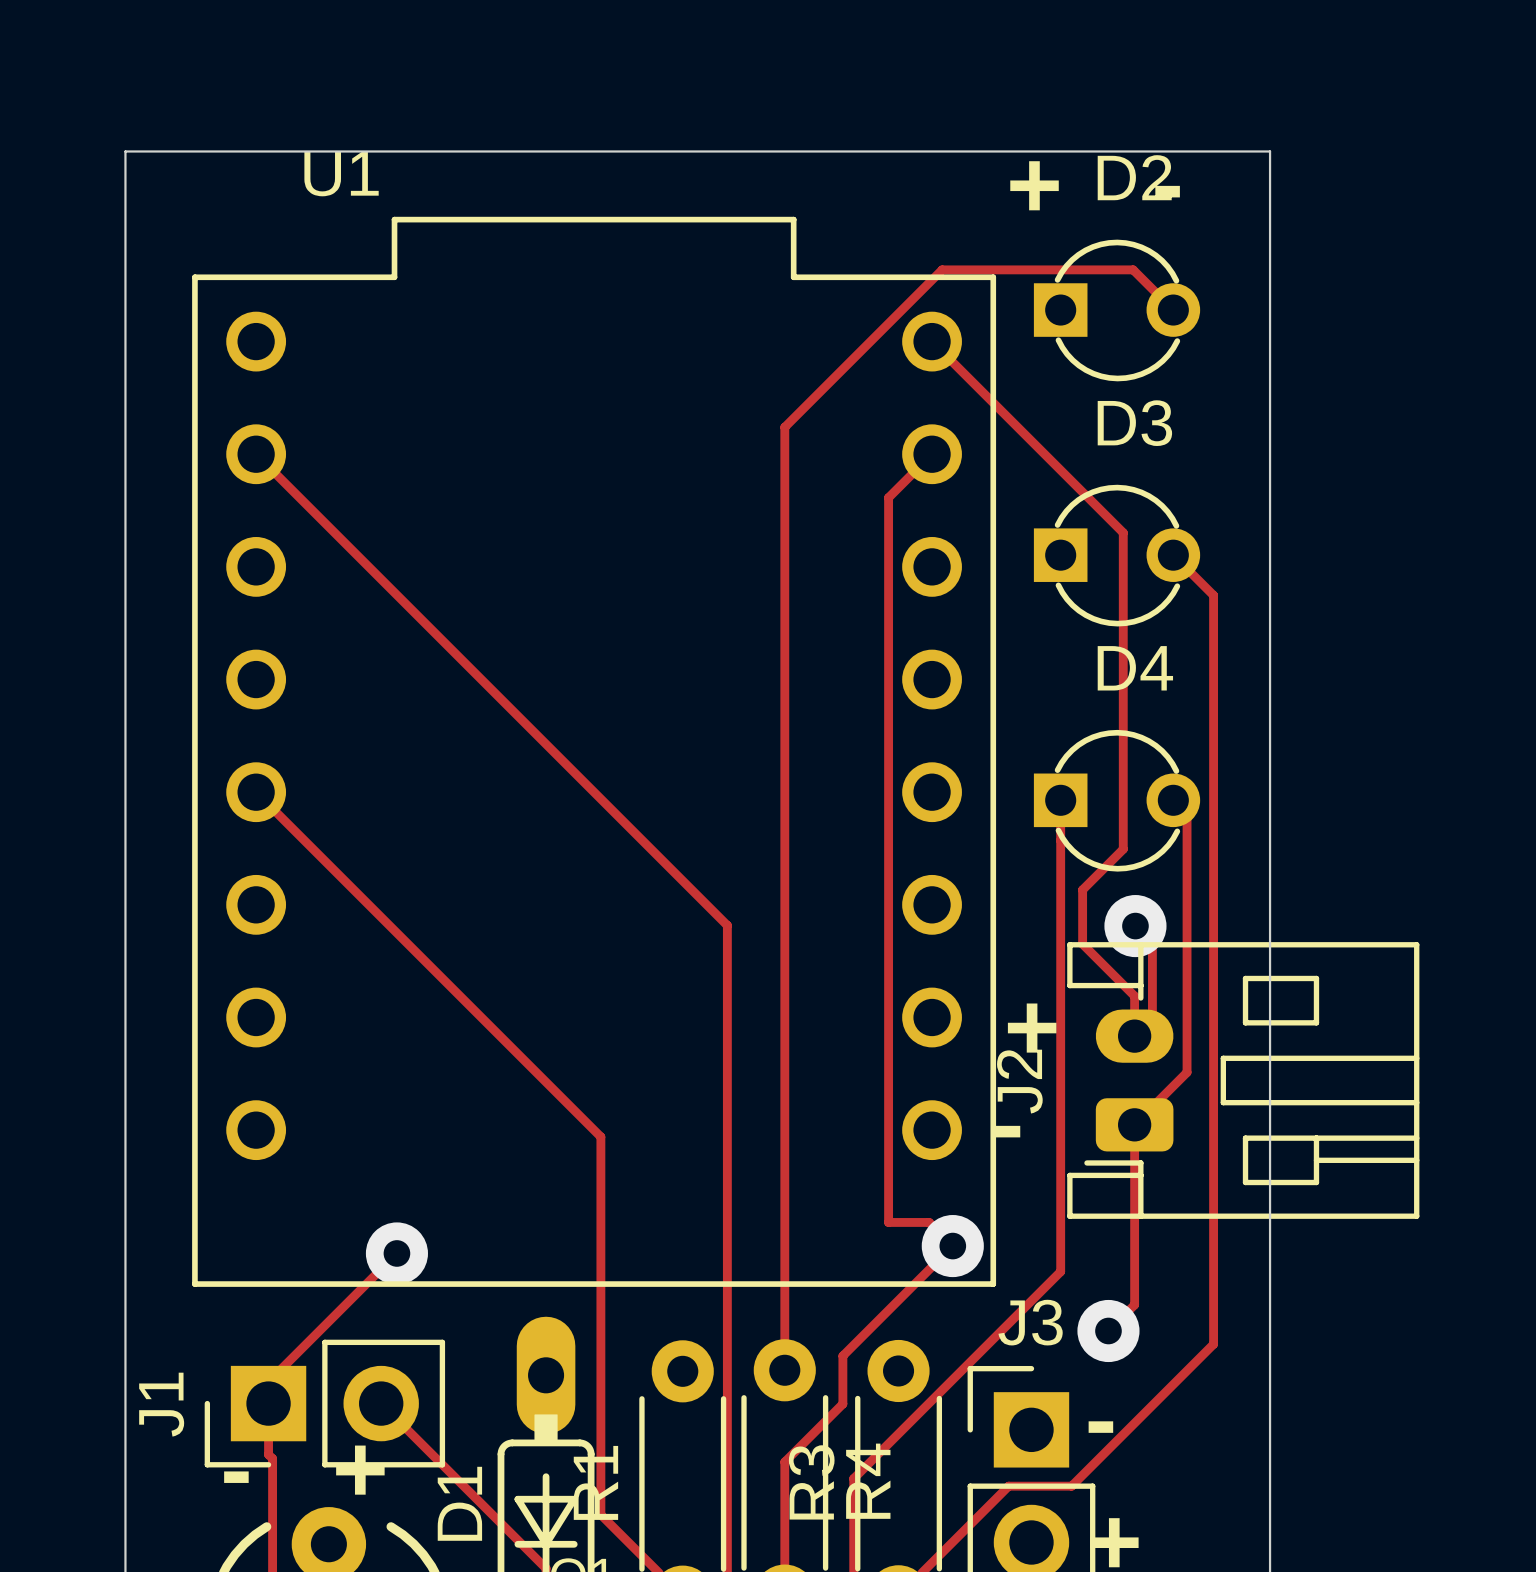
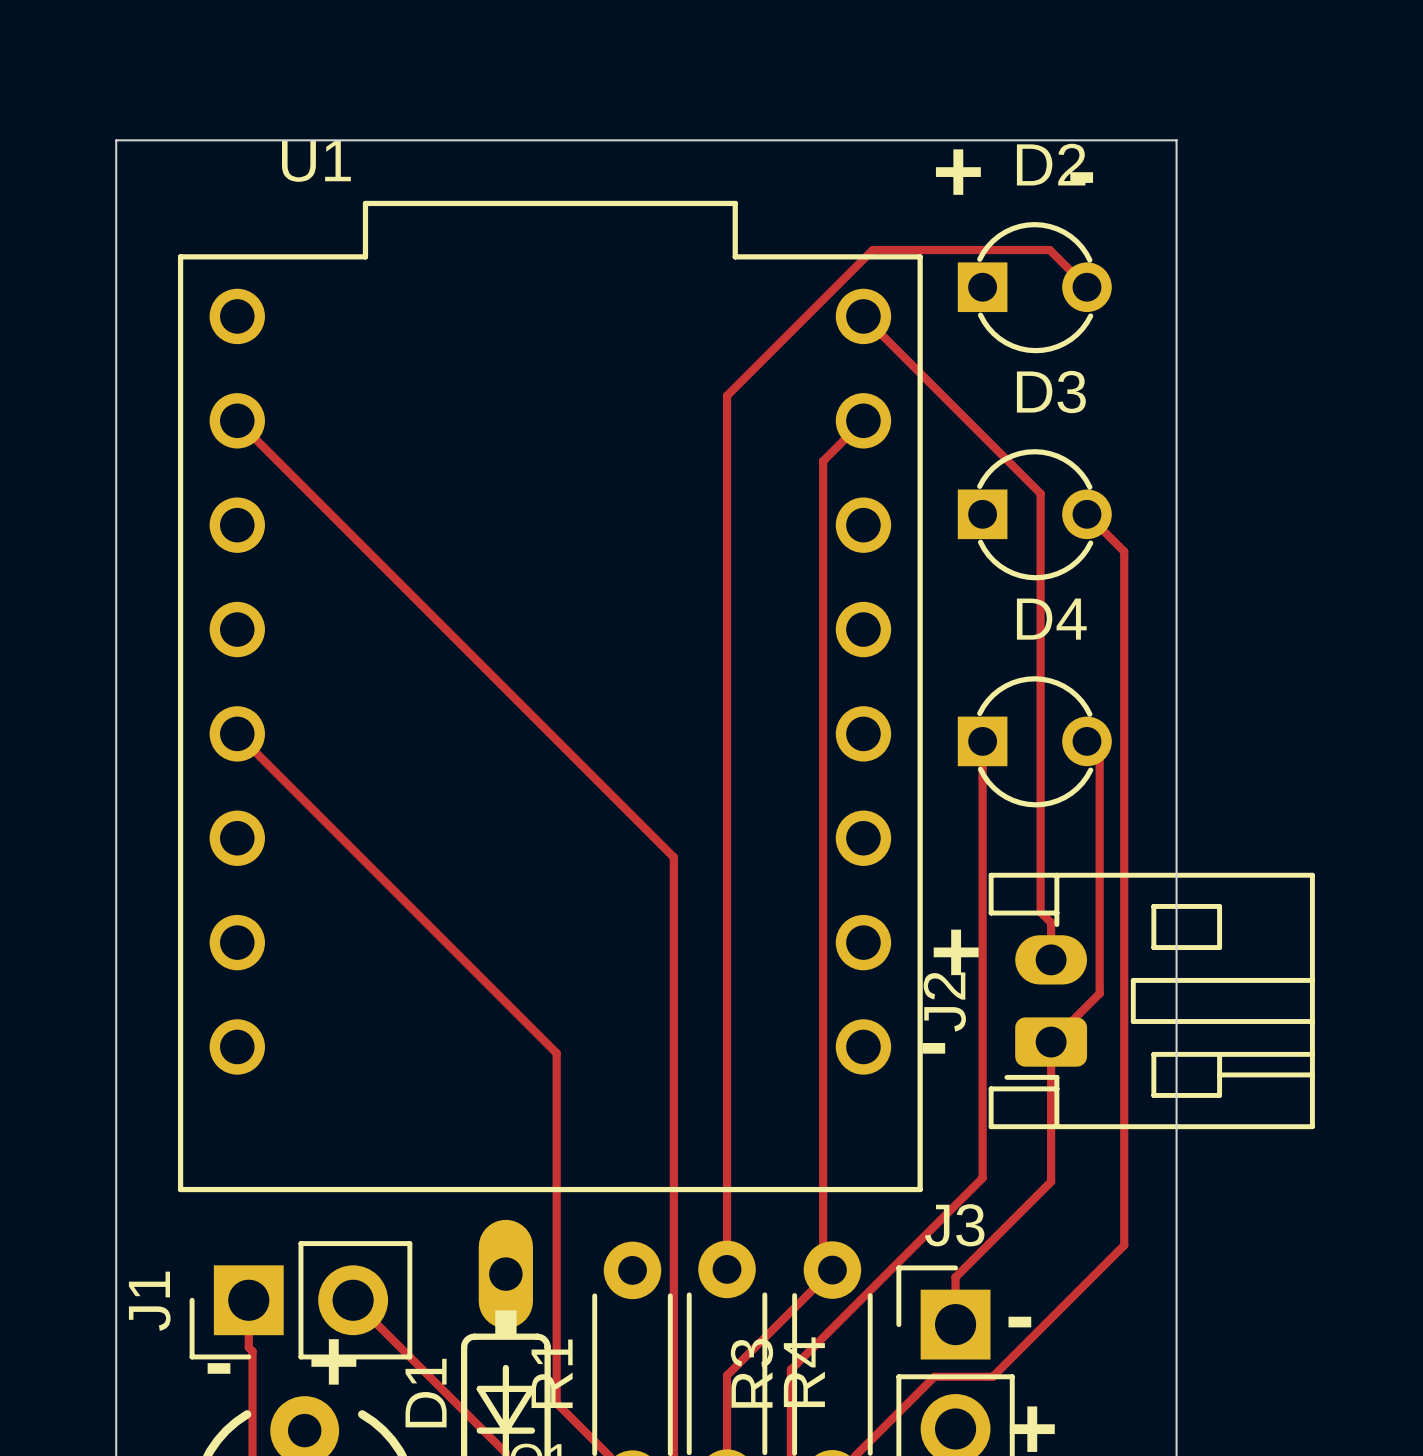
track: (1123, 849) (1082, 889) (1082, 944) (1123, 984) -> (1040, 786) (1040, 912)
track: (1135, 926) (1152, 943) (1152, 1036) -> none
via: (1135, 926) -> none
track: (888, 1222) (929, 1222) (952, 1246) (842, 1355) (842, 1403) (784, 1462) (784, 1484) -> (823, 1132) (823, 1260) (832, 1270) (727, 1375)
via: (952, 1246) -> none
track: (396, 1253) (268, 1381) (268, 1403) -> none
via: (396, 1253) -> none
track: (1134, 1275) (1134, 1304) (1108, 1331) -> (1051, 1181) (955, 1277) (955, 1304)
via: (1108, 1331) -> none

